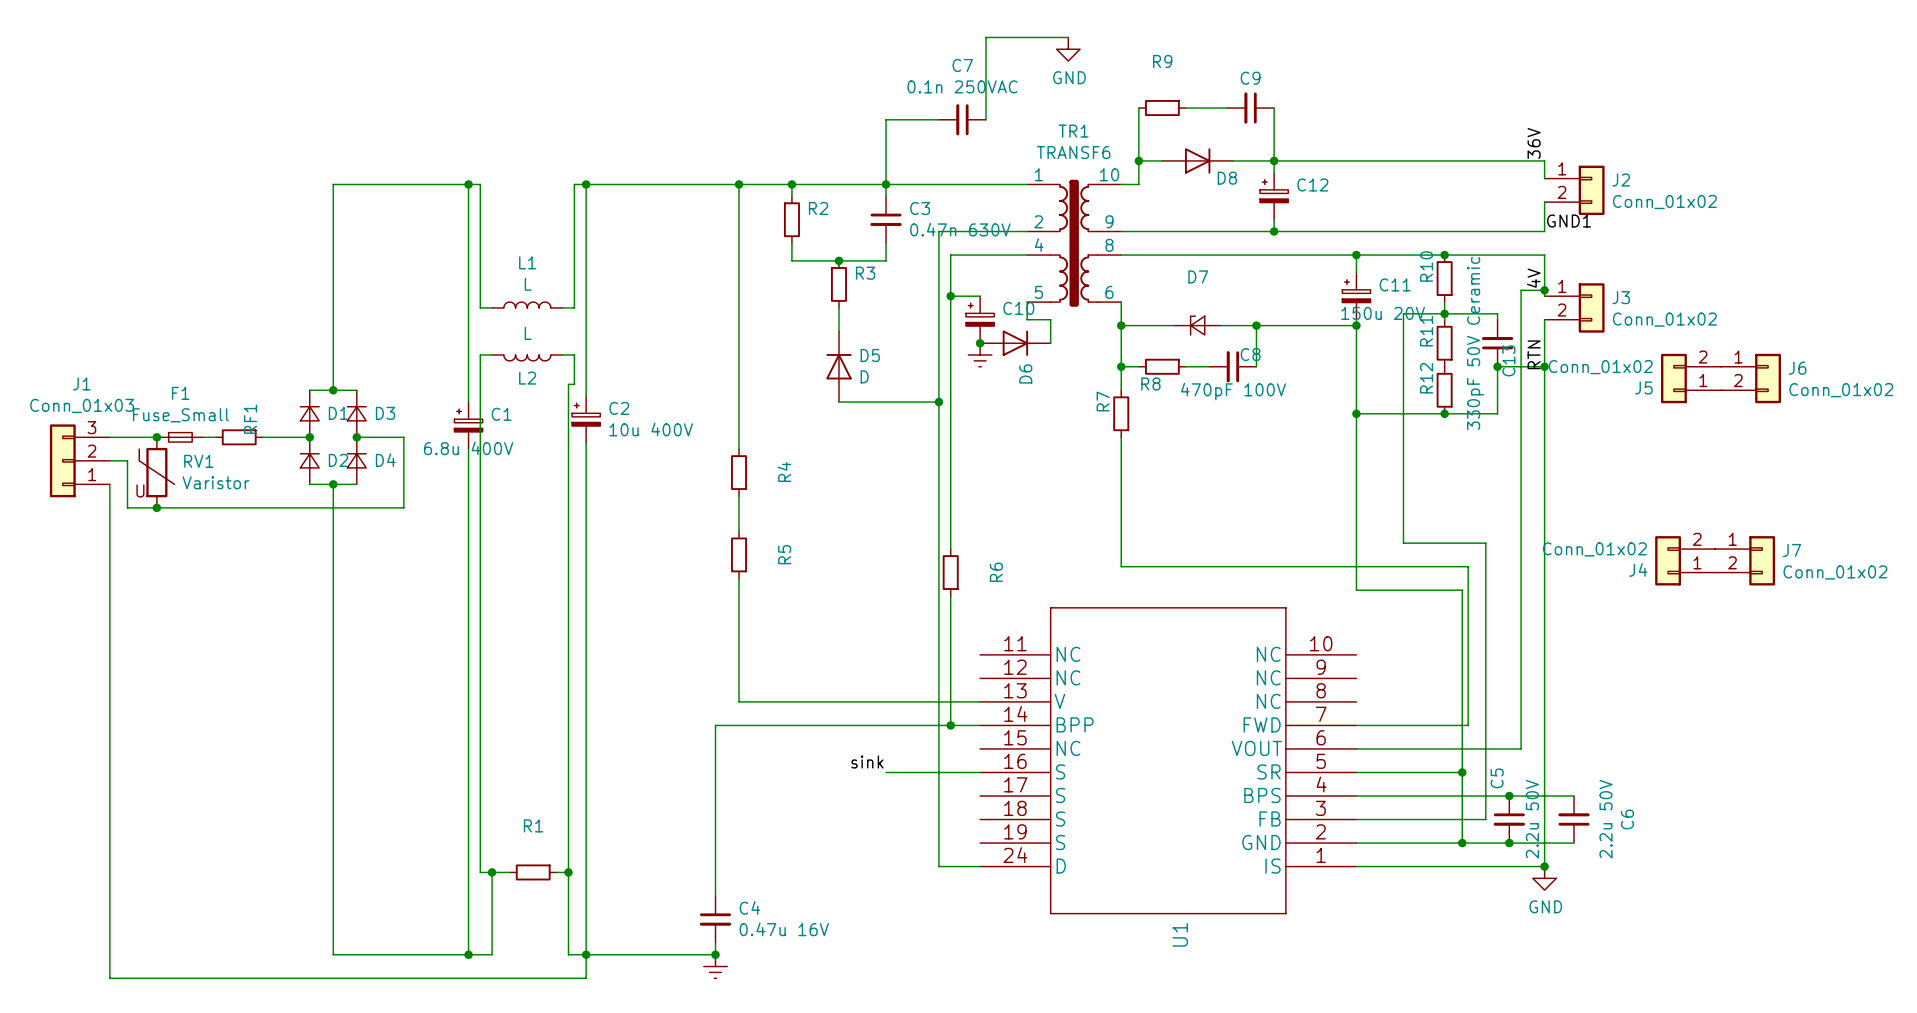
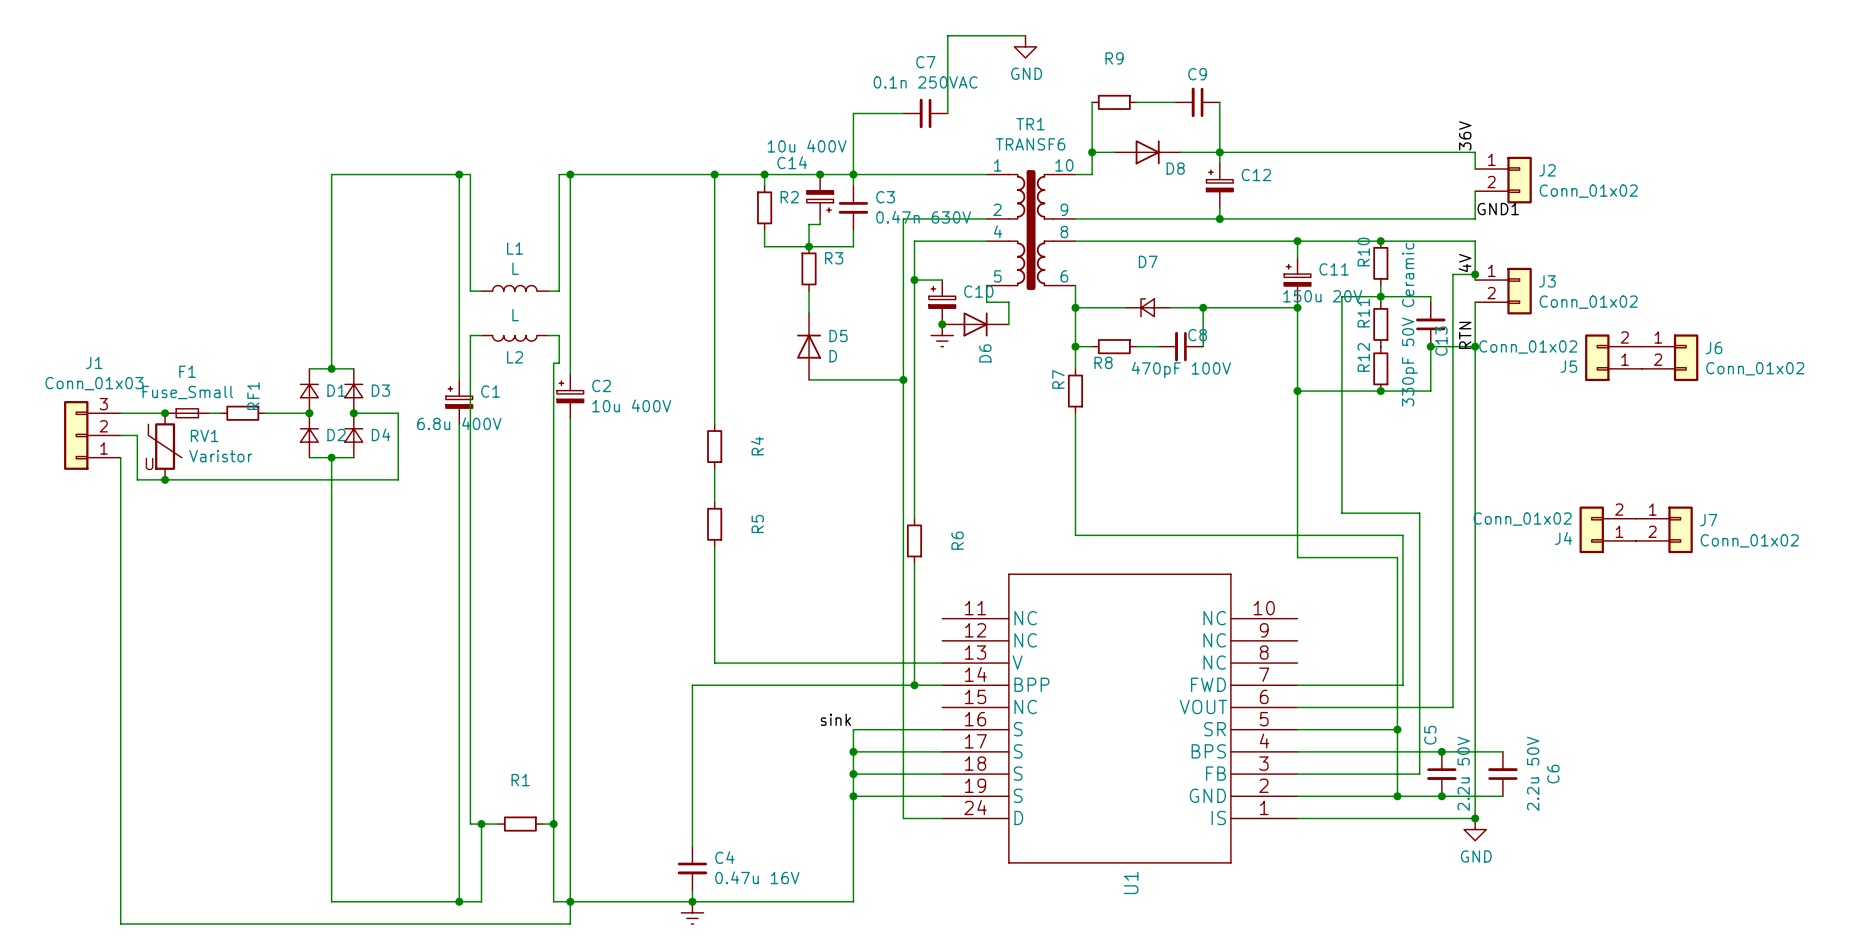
junction: none -> (820, 174)
C14: none -> 10u 400V (820, 196)
wire: none -> (820, 218) (820, 224) (809, 224) (809, 246)
wire: none -> (853, 729) (853, 901) (692, 901)
wire: none -> (853, 751) (942, 751)
junction: none -> (853, 751)
wire: none -> (853, 774) (942, 774)
junction: none -> (853, 774)
wire: none -> (853, 796) (942, 796)
junction: none -> (853, 796)

